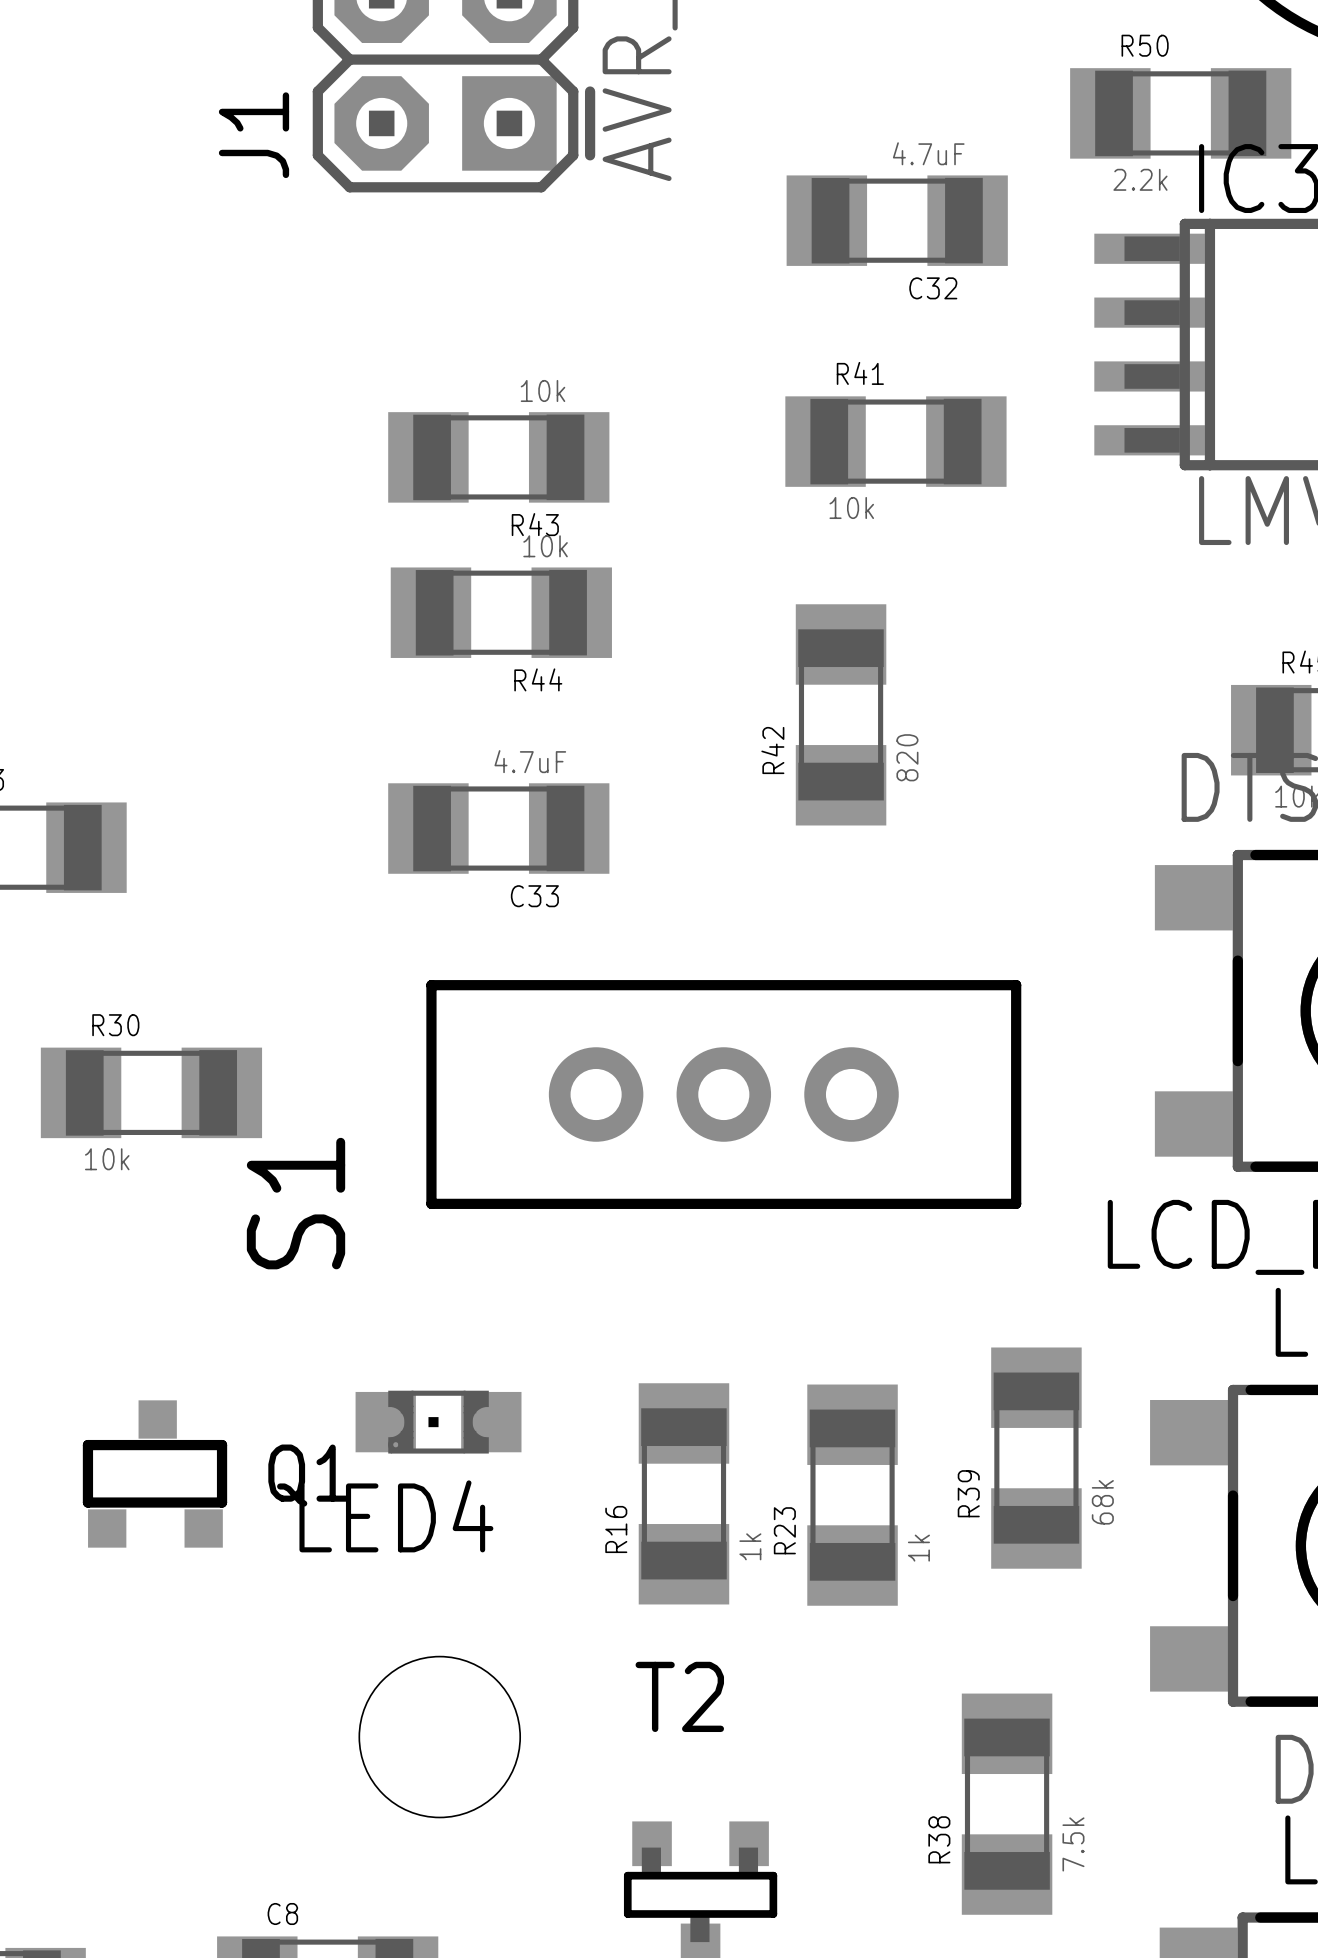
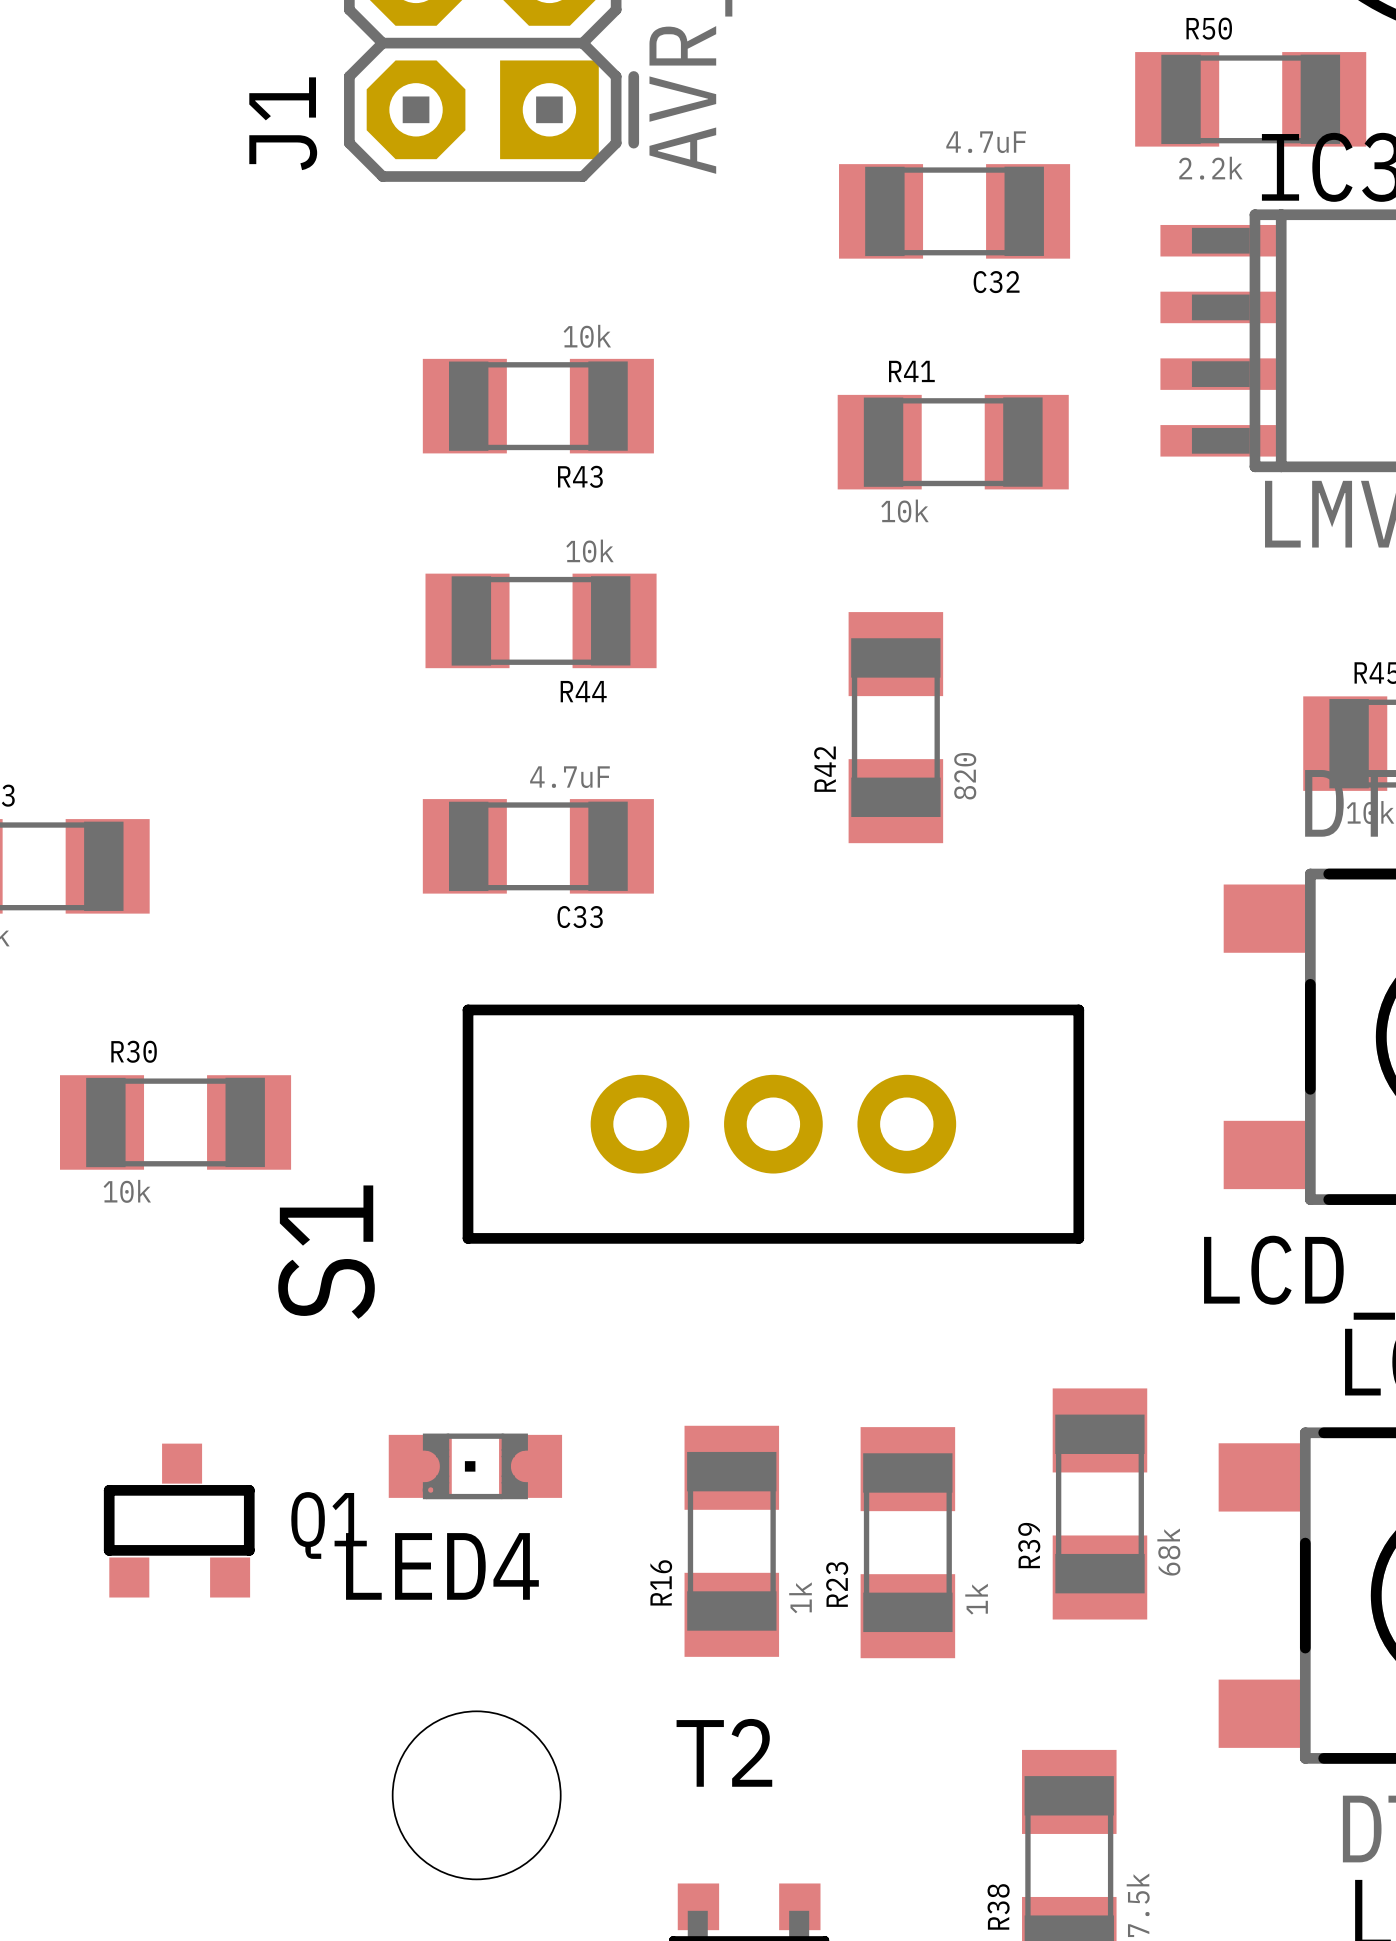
R43 position: (498, 457) -> (538, 406)

